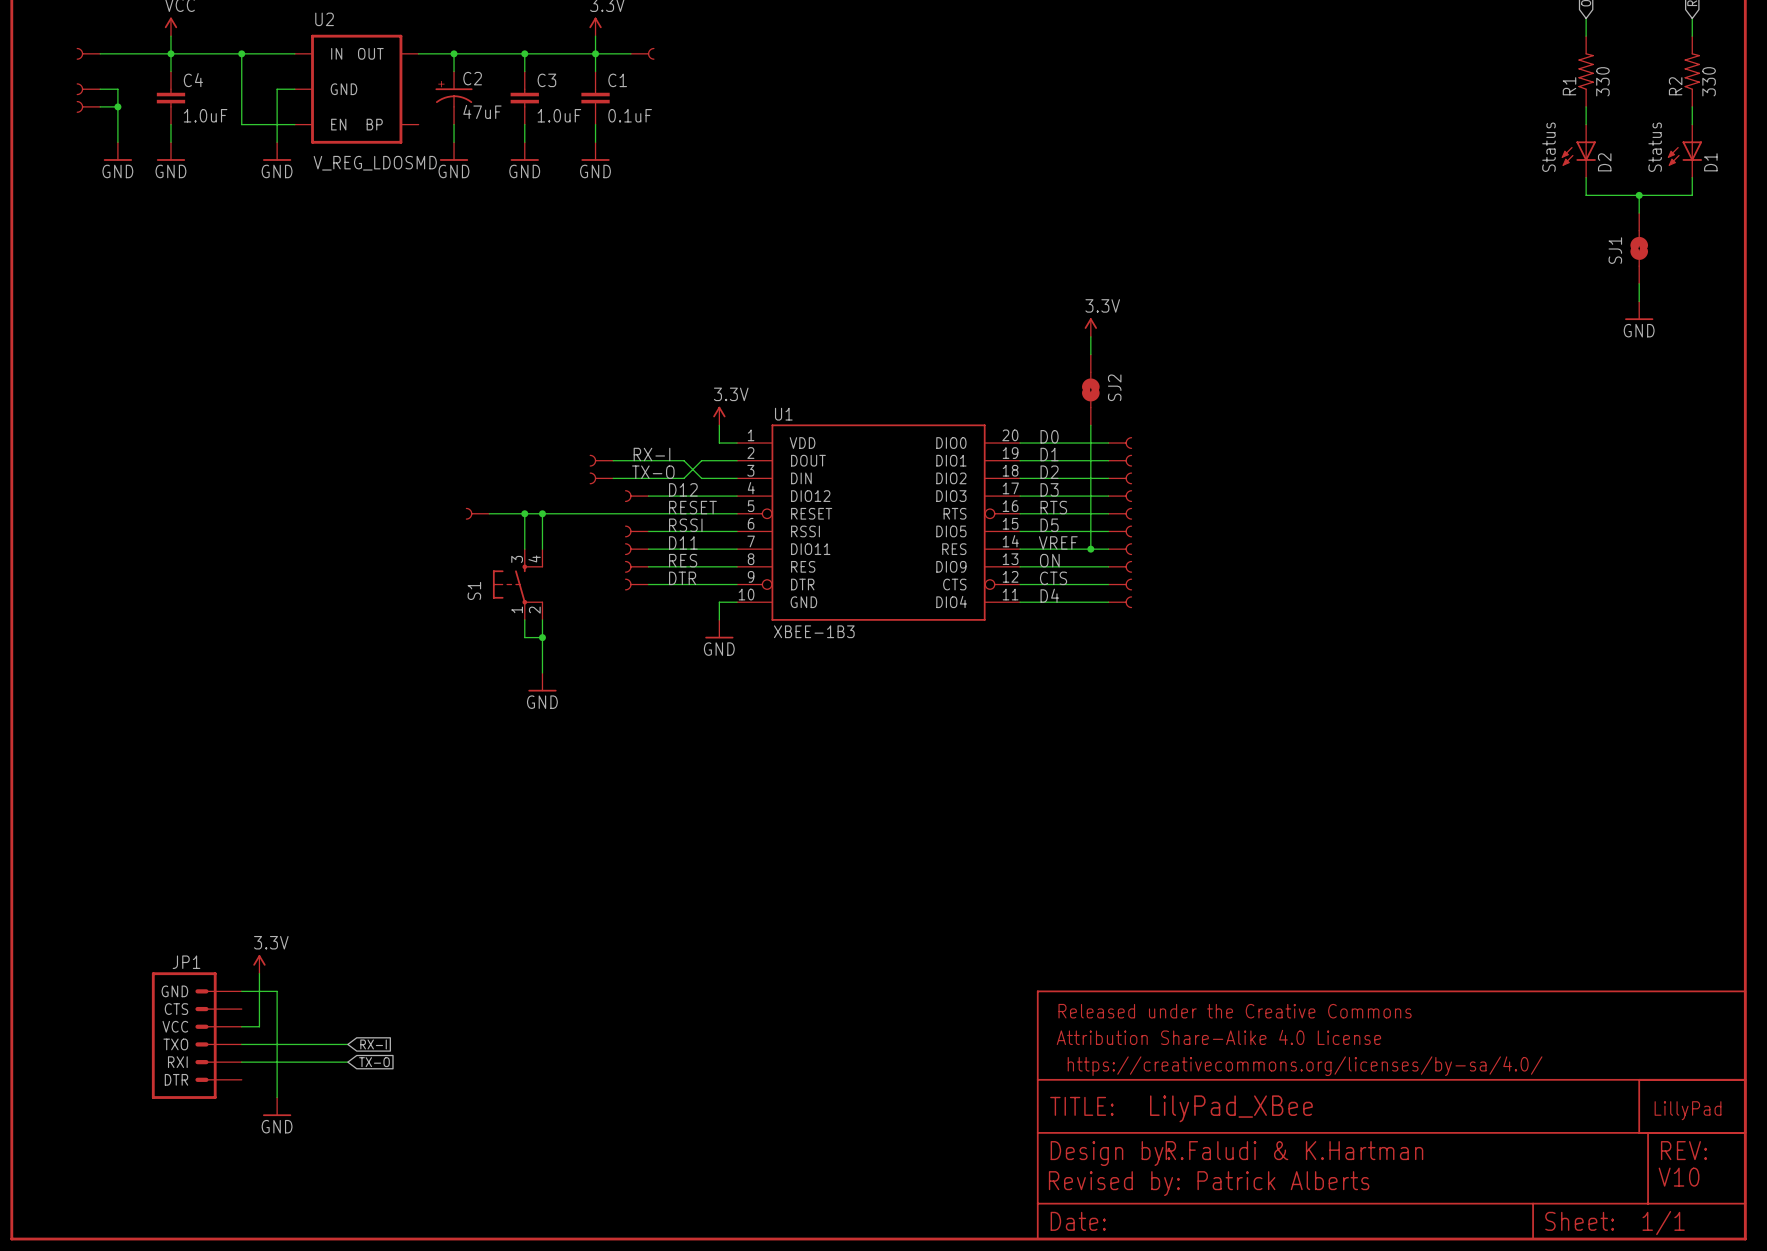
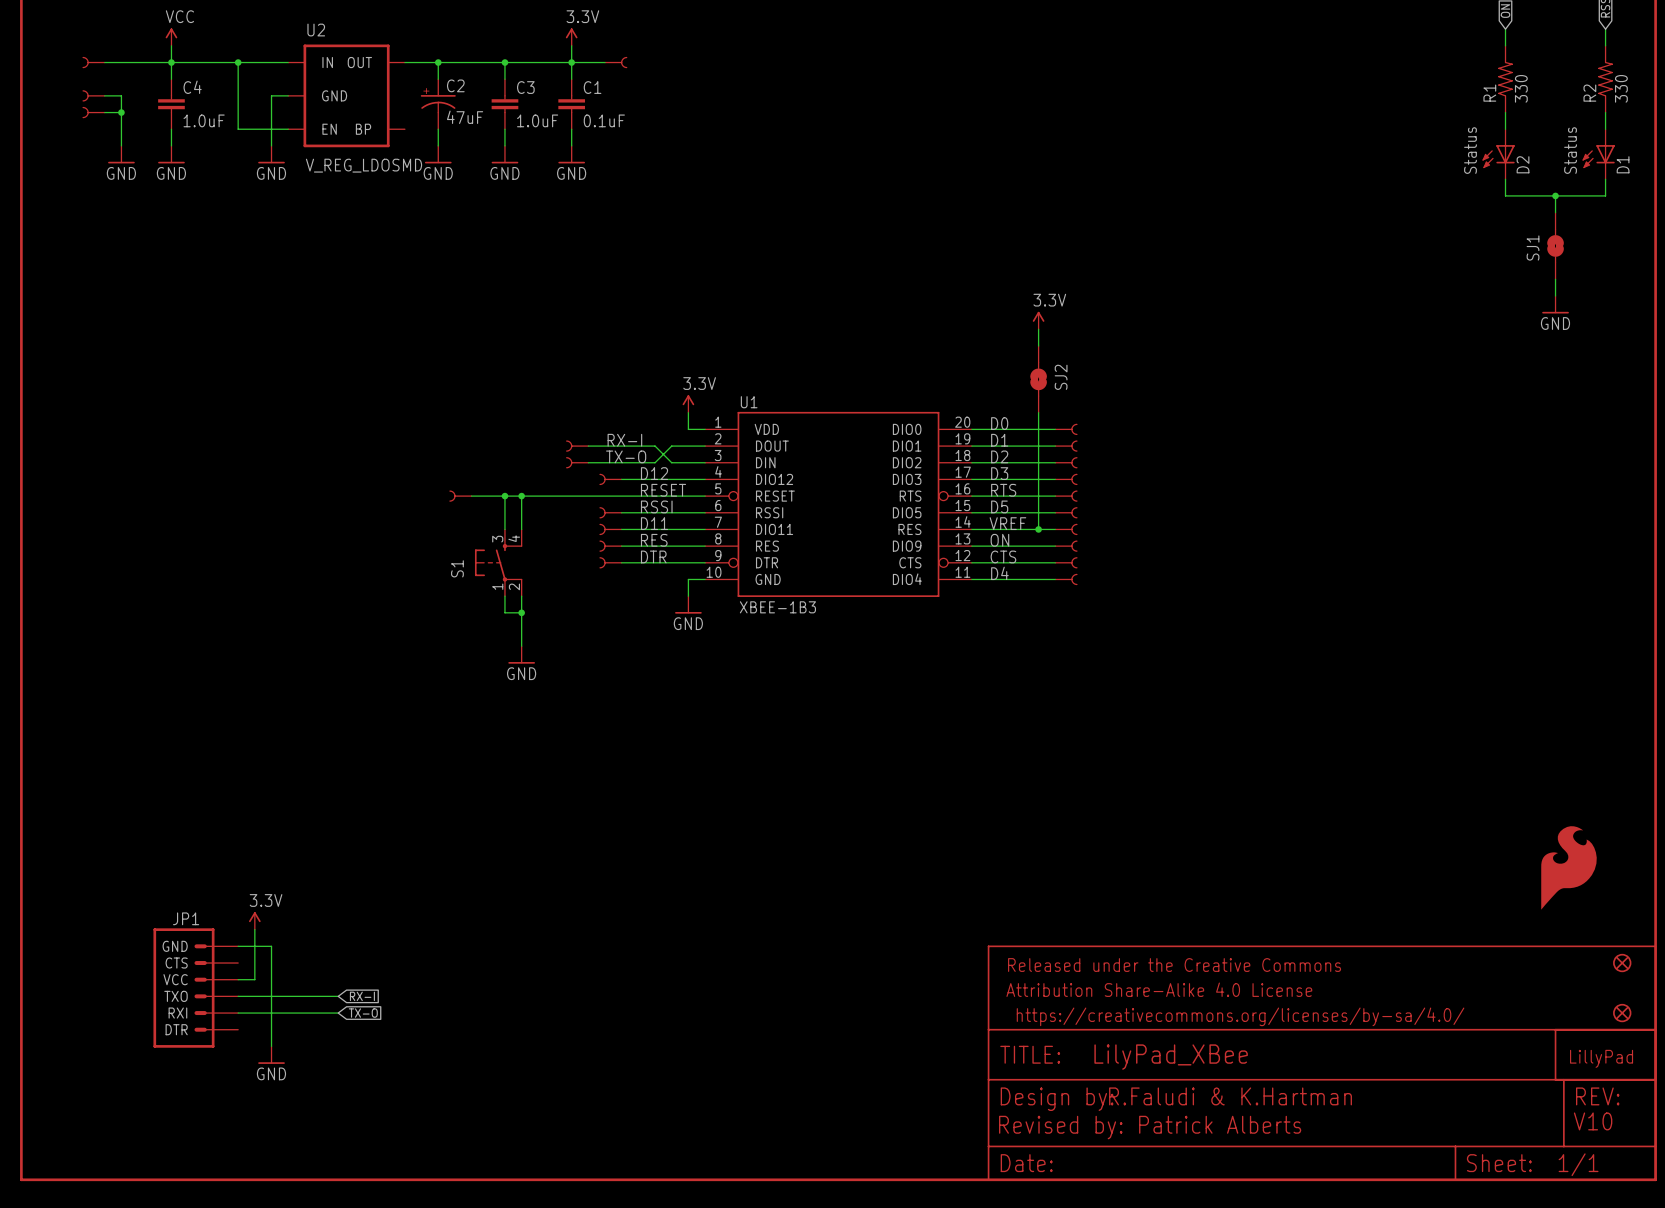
part: none -> (1568, 867)
part: none -> (1622, 963)
part: none -> (1622, 1013)

